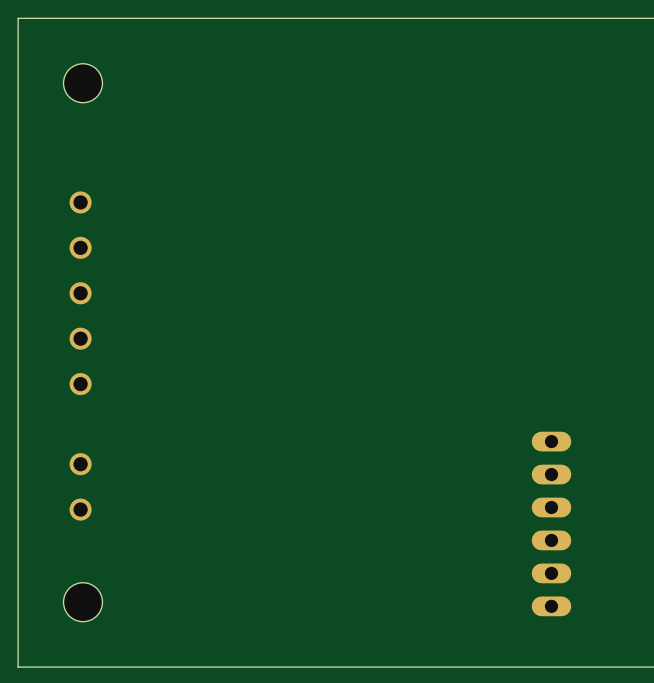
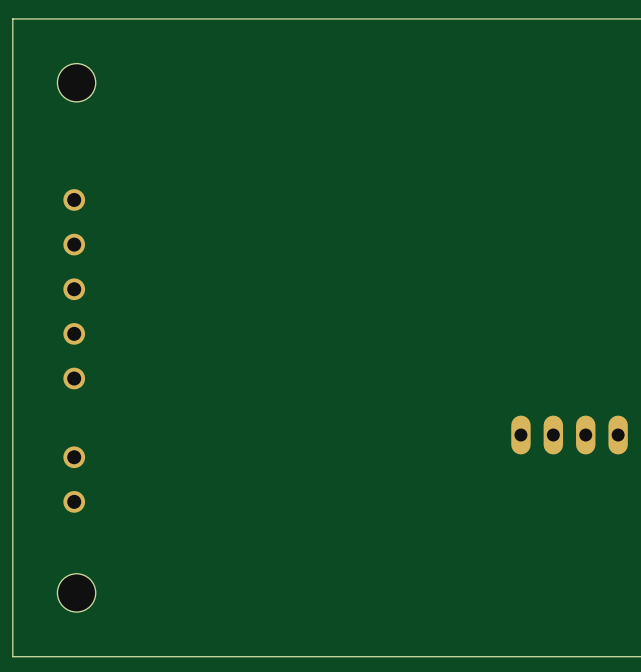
part: none -> (569, 435)
part: (551, 523) -> none

